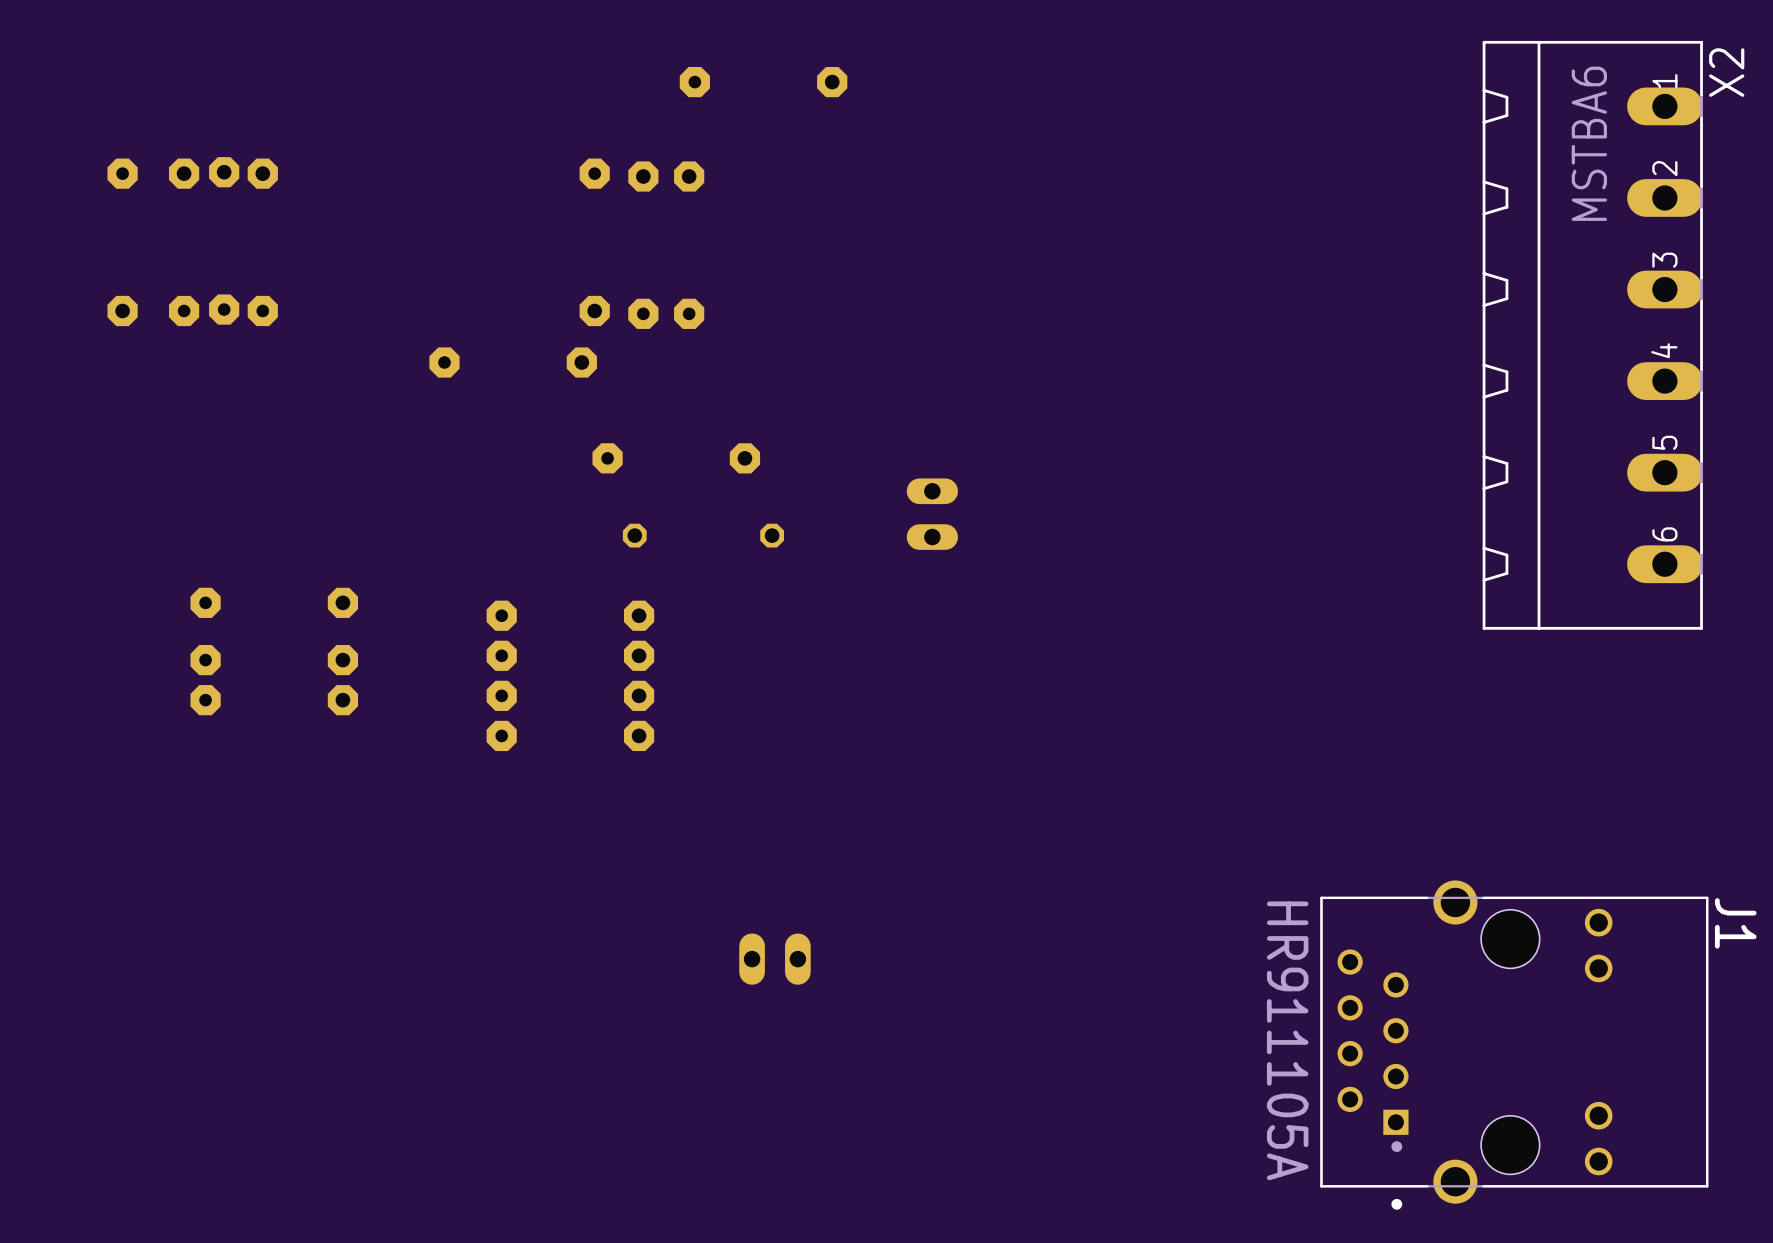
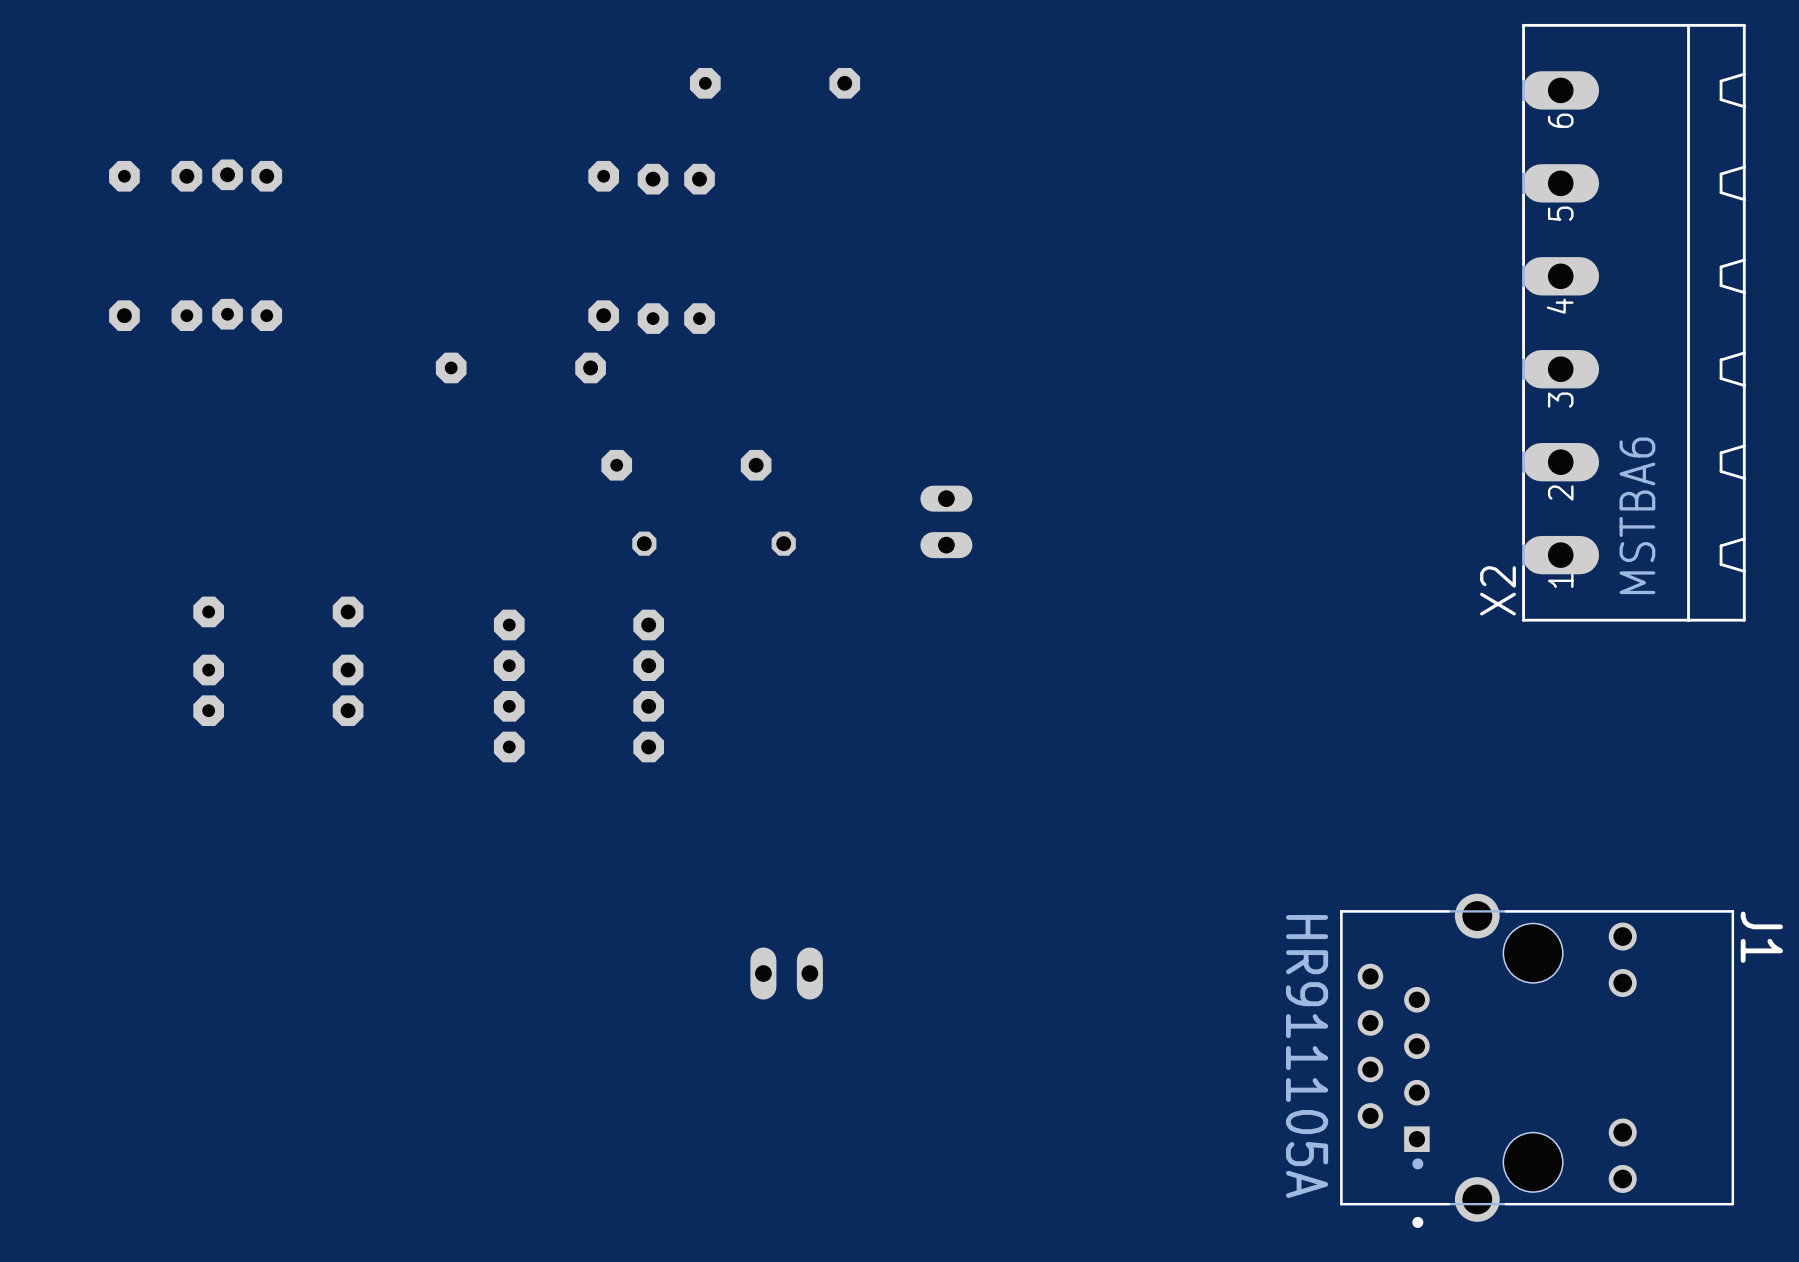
X2 footprint: [1482, 40, 1703, 630] -> [1522, 23, 1746, 622]
X2 name position: X2 (1726, 72) -> X2 (1497, 590)
X2 value position: MSTBA6 (1589, 143) -> MSTBA6 (1637, 515)

